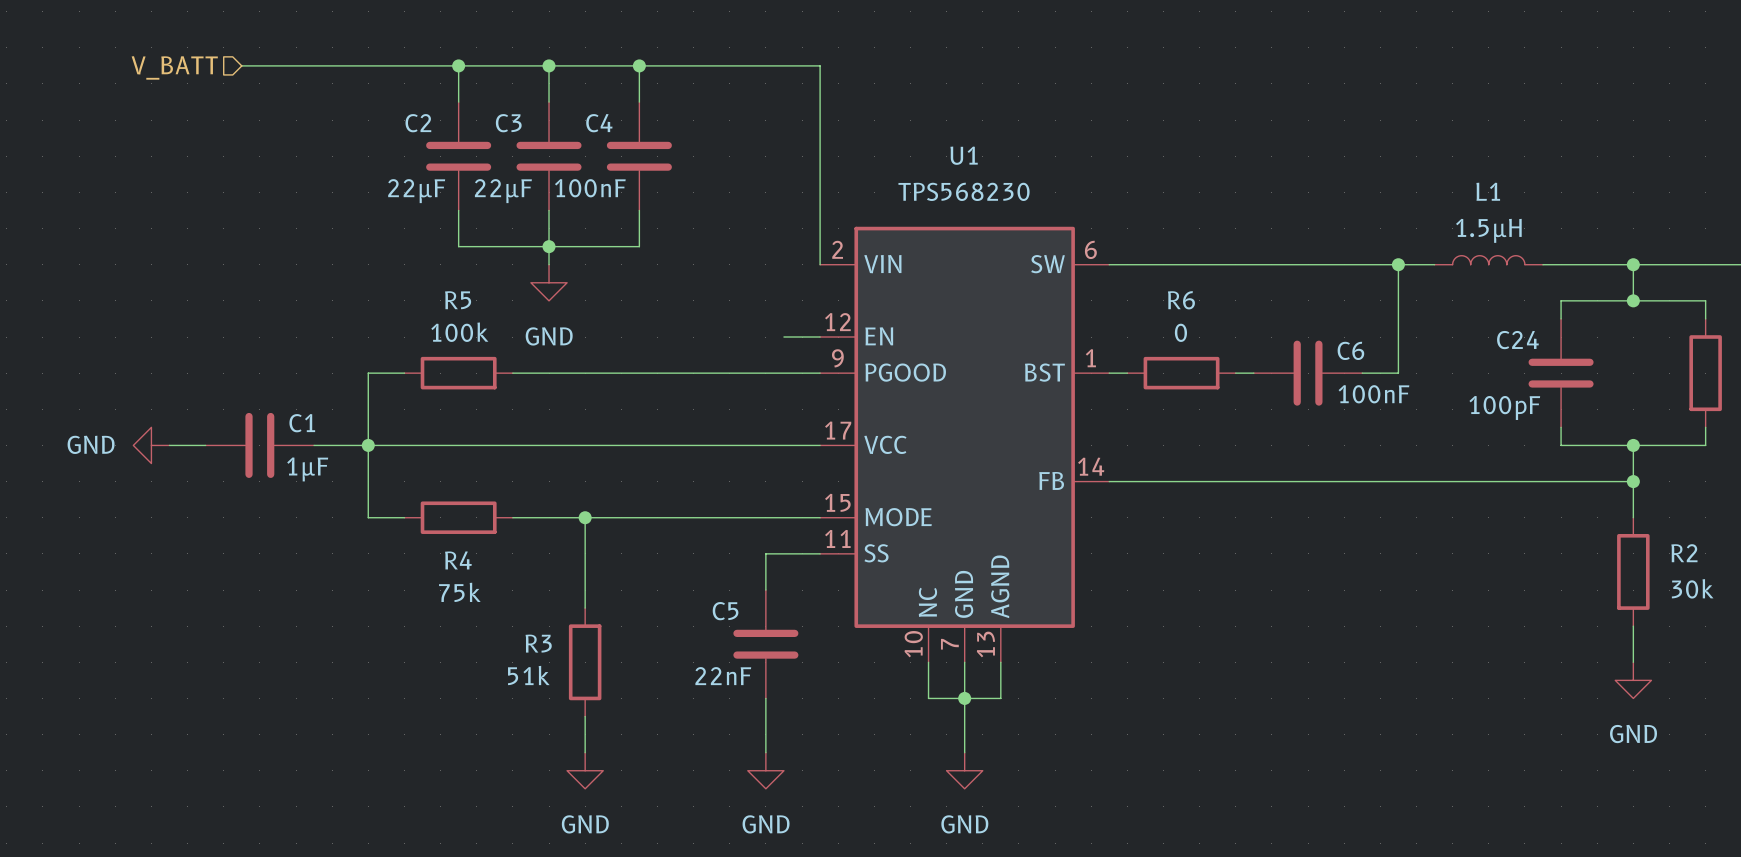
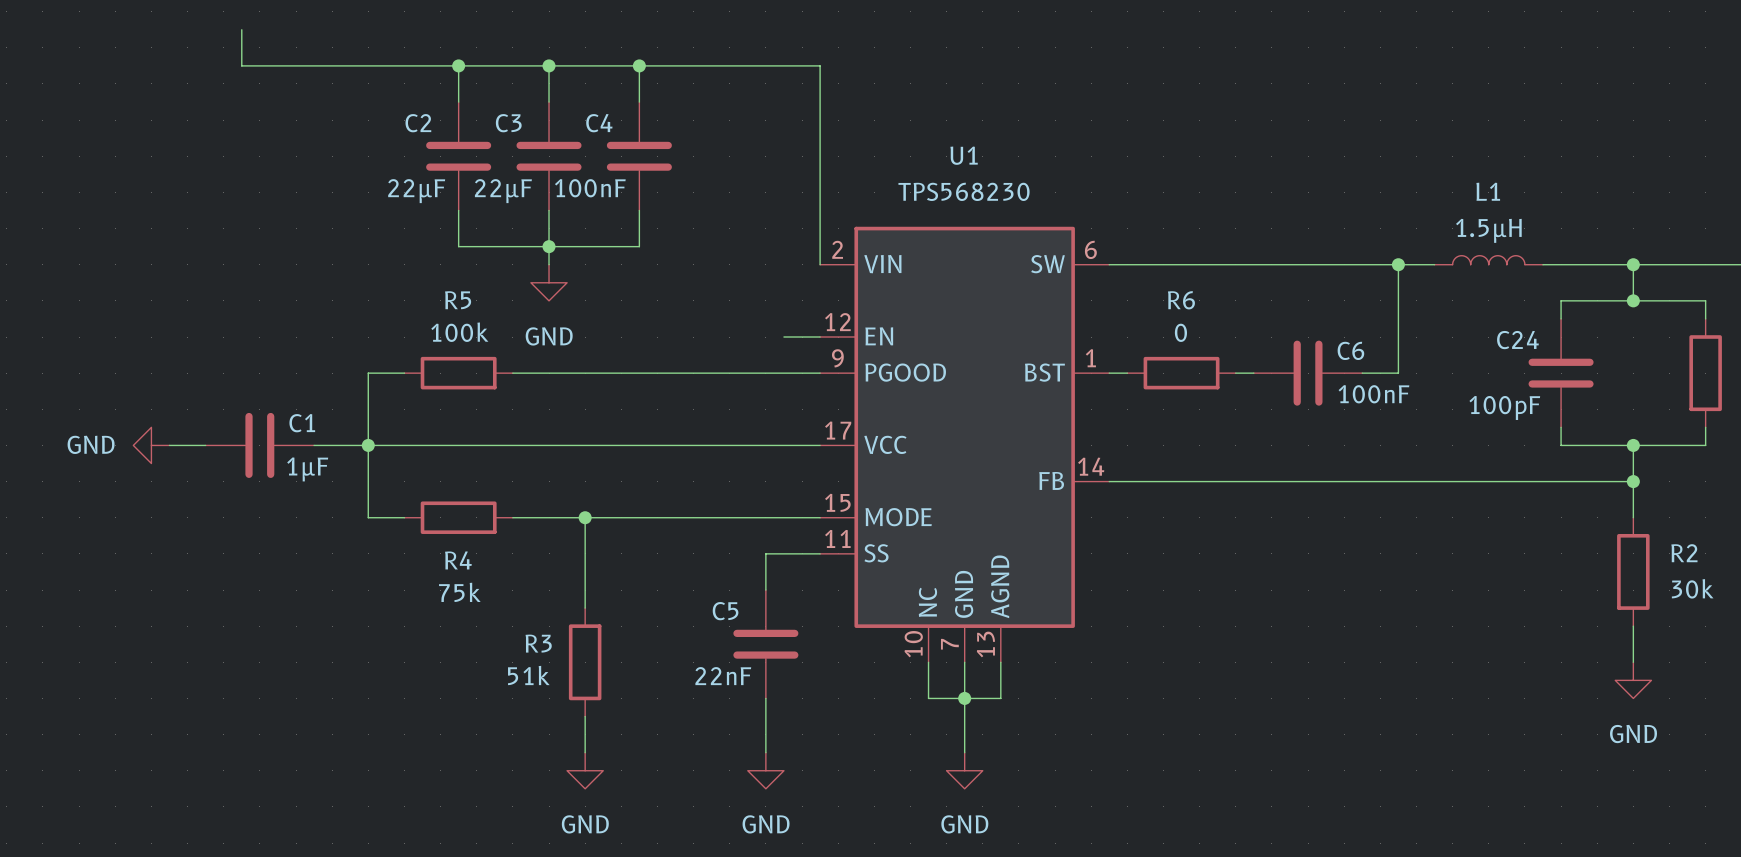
wire: none -> (241, 29) (241, 65)
hierarchical label: V_BATT (174, 67) -> none

